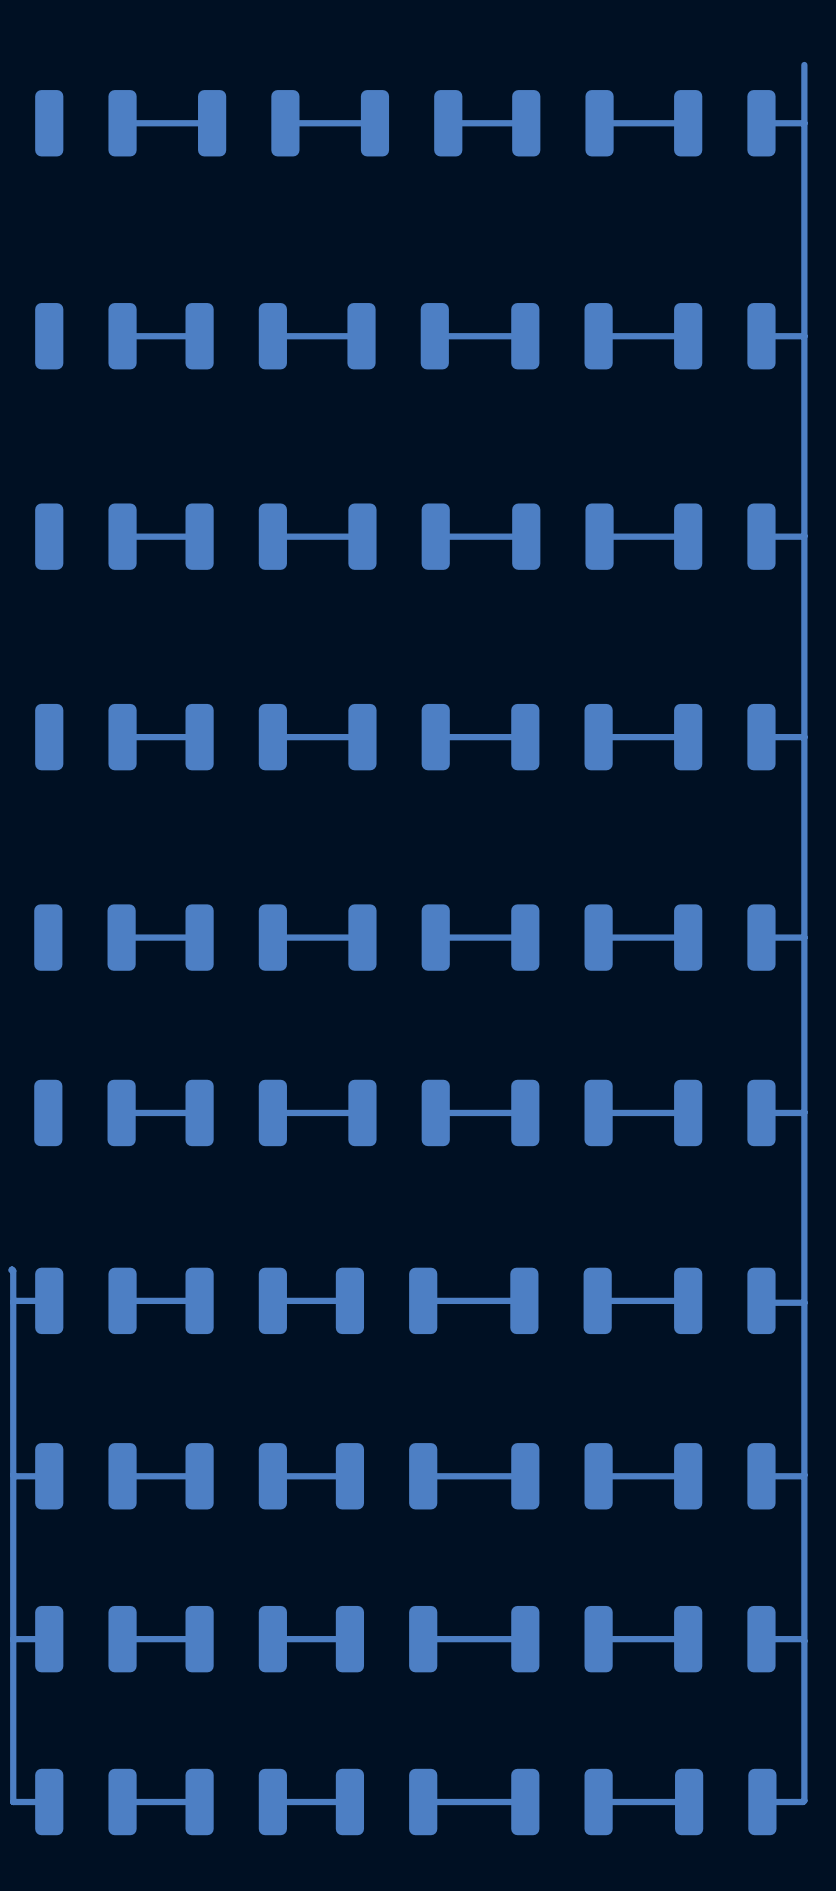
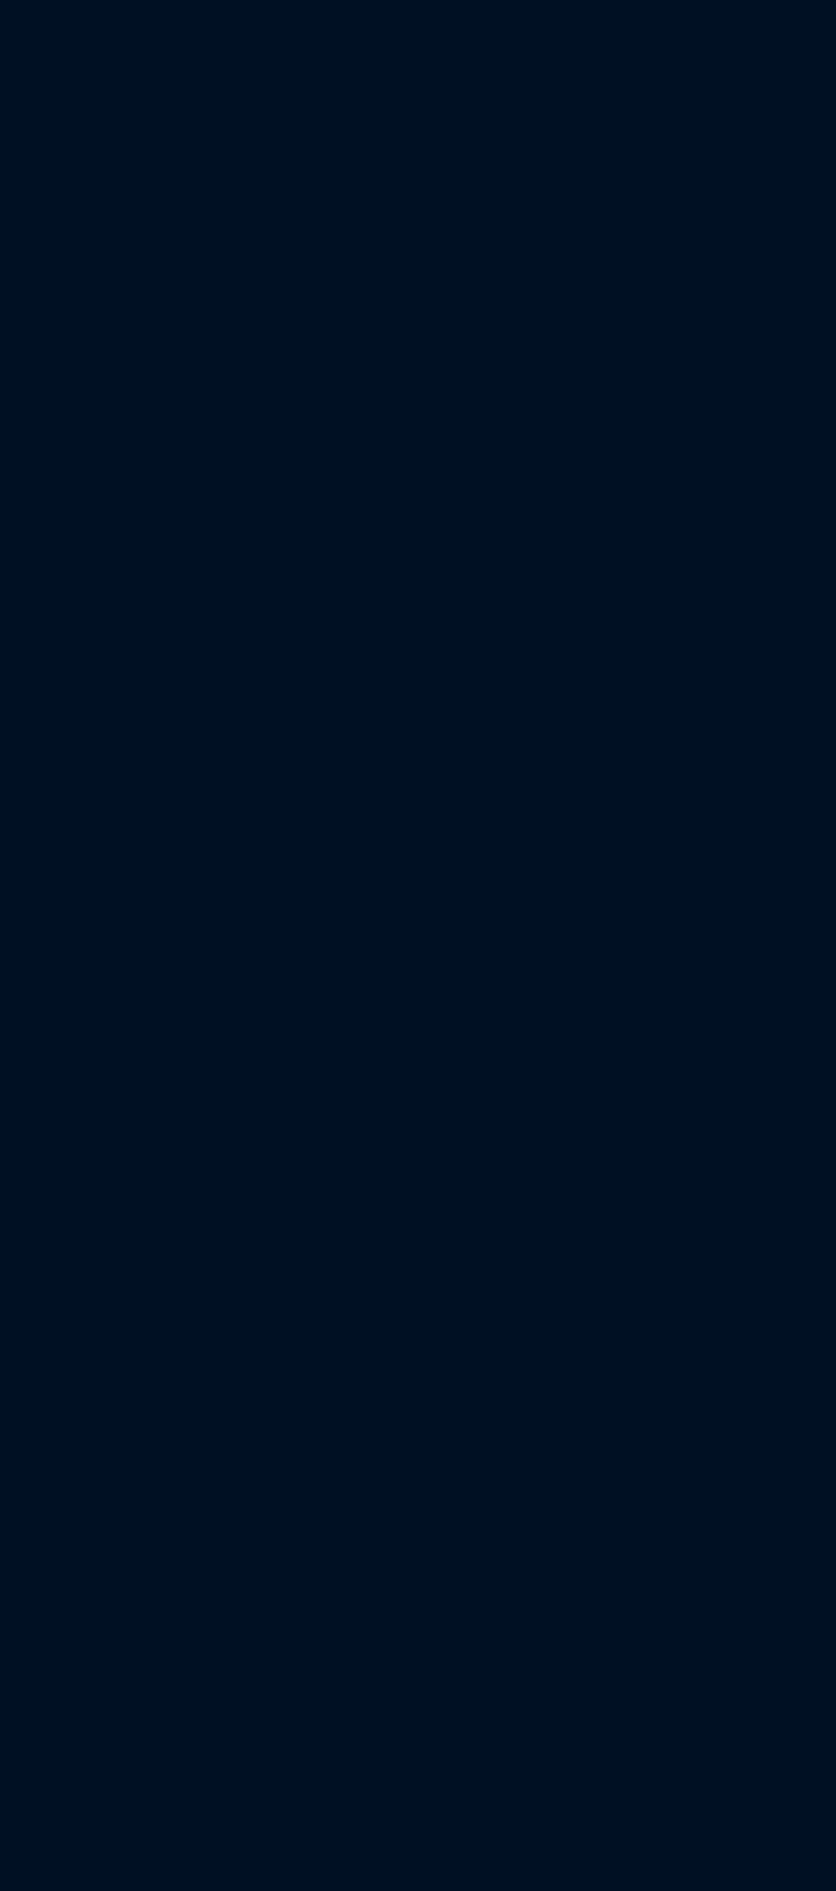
bottom track: (804, 64) (804, 1800) (762, 1802) -> none
part: (85, 123) -> none
bottom track: (122, 123) (212, 123) -> none
part: (248, 123) -> none
bottom track: (285, 123) (374, 123) -> none
part: (411, 123) -> none
bottom track: (448, 123) (526, 123) -> none
part: (562, 123) -> none
bottom track: (599, 123) (688, 123) -> none
part: (724, 123) -> none
bottom track: (761, 123) (804, 123) -> none
part: (85, 336) -> none
bottom track: (122, 336) (199, 336) -> none
part: (236, 336) -> none
bottom track: (272, 336) (361, 336) -> none
part: (398, 336) -> none
bottom track: (434, 336) (525, 336) -> none
part: (561, 336) -> none
bottom track: (598, 336) (688, 336) -> none
part: (724, 336) -> none
bottom track: (761, 336) (804, 336) -> none
part: (85, 536) -> none
bottom track: (122, 536) (199, 536) -> none
part: (236, 536) -> none
bottom track: (272, 536) (362, 536) -> none
part: (399, 536) -> none
bottom track: (435, 536) (526, 536) -> none
part: (562, 536) -> none
bottom track: (599, 536) (688, 536) -> none
part: (724, 536) -> none
bottom track: (804, 536) (761, 536) -> none
part: (85, 737) -> none
bottom track: (122, 737) (199, 737) -> none
part: (236, 737) -> none
bottom track: (272, 737) (362, 737) -> none
part: (399, 737) -> none
bottom track: (435, 737) (525, 737) -> none
part: (561, 737) -> none
bottom track: (598, 737) (688, 737) -> none
part: (724, 737) -> none
bottom track: (761, 737) (804, 737) -> none
part: (84, 937) -> none
bottom track: (121, 937) (199, 937) -> none
part: (236, 937) -> none
bottom track: (272, 937) (362, 937) -> none
part: (399, 937) -> none
bottom track: (435, 937) (525, 937) -> none
part: (561, 937) -> none
bottom track: (598, 937) (688, 937) -> none
part: (724, 937) -> none
bottom track: (761, 937) (804, 937) -> none
part: (84, 1112) -> none
bottom track: (121, 1112) (199, 1112) -> none
part: (236, 1112) -> none
bottom track: (272, 1112) (362, 1112) -> none
part: (399, 1112) -> none
bottom track: (435, 1112) (525, 1112) -> none
part: (561, 1112) -> none
bottom track: (598, 1112) (688, 1112) -> none
part: (724, 1112) -> none
bottom track: (804, 1112) (761, 1112) -> none
bottom track: (11, 1270) (13, 1270) (13, 1802) (49, 1802) -> none
bottom track: (49, 1300) (13, 1302) -> none
part: (85, 1300) -> none
bottom track: (122, 1300) (199, 1300) -> none
part: (236, 1300) -> none
bottom track: (272, 1300) (349, 1300) -> none
part: (386, 1300) -> none
bottom track: (423, 1300) (524, 1300) -> none
part: (561, 1300) -> none
bottom track: (597, 1300) (688, 1300) -> none
part: (724, 1300) -> none
bottom track: (761, 1300) (763, 1302) (804, 1302) -> none
bottom track: (13, 1475) (49, 1476) -> none
bottom track: (804, 1475) (761, 1476) -> none
part: (85, 1476) -> none
bottom track: (122, 1476) (199, 1476) -> none
part: (236, 1476) -> none
bottom track: (272, 1476) (349, 1476) -> none
part: (386, 1476) -> none
bottom track: (423, 1476) (525, 1476) -> none
part: (561, 1476) -> none
bottom track: (598, 1476) (688, 1476) -> none
part: (724, 1476) -> none
bottom track: (49, 1639) (13, 1639) -> none
part: (85, 1639) -> none
bottom track: (122, 1639) (199, 1639) -> none
part: (236, 1639) -> none
bottom track: (272, 1639) (349, 1639) -> none
part: (386, 1639) -> none
bottom track: (423, 1639) (525, 1639) -> none
part: (561, 1639) -> none
bottom track: (598, 1639) (688, 1639) -> none
part: (724, 1639) -> none
bottom track: (761, 1639) (802, 1639) (804, 1641) -> none
part: (85, 1802) -> none
bottom track: (122, 1802) (199, 1802) -> none
part: (236, 1802) -> none
bottom track: (272, 1802) (349, 1802) -> none
part: (386, 1802) -> none
bottom track: (423, 1802) (525, 1802) -> none
part: (561, 1802) -> none
bottom track: (598, 1802) (689, 1802) -> none
part: (725, 1802) -> none

